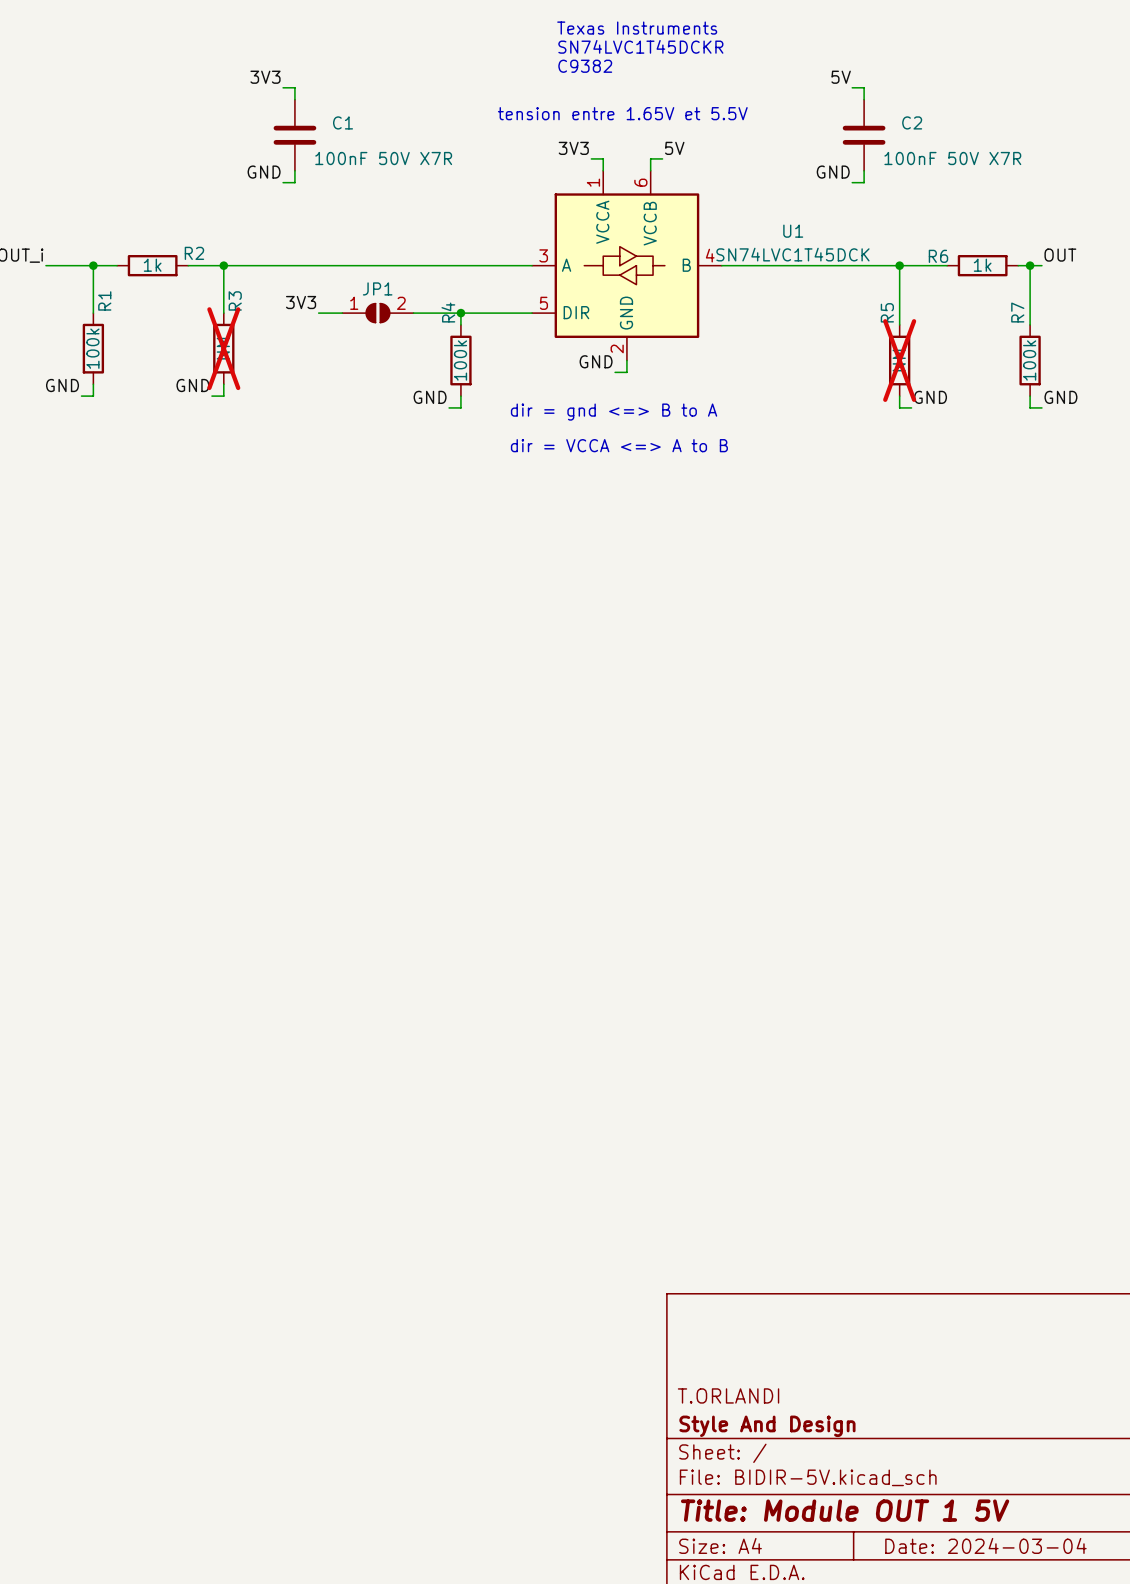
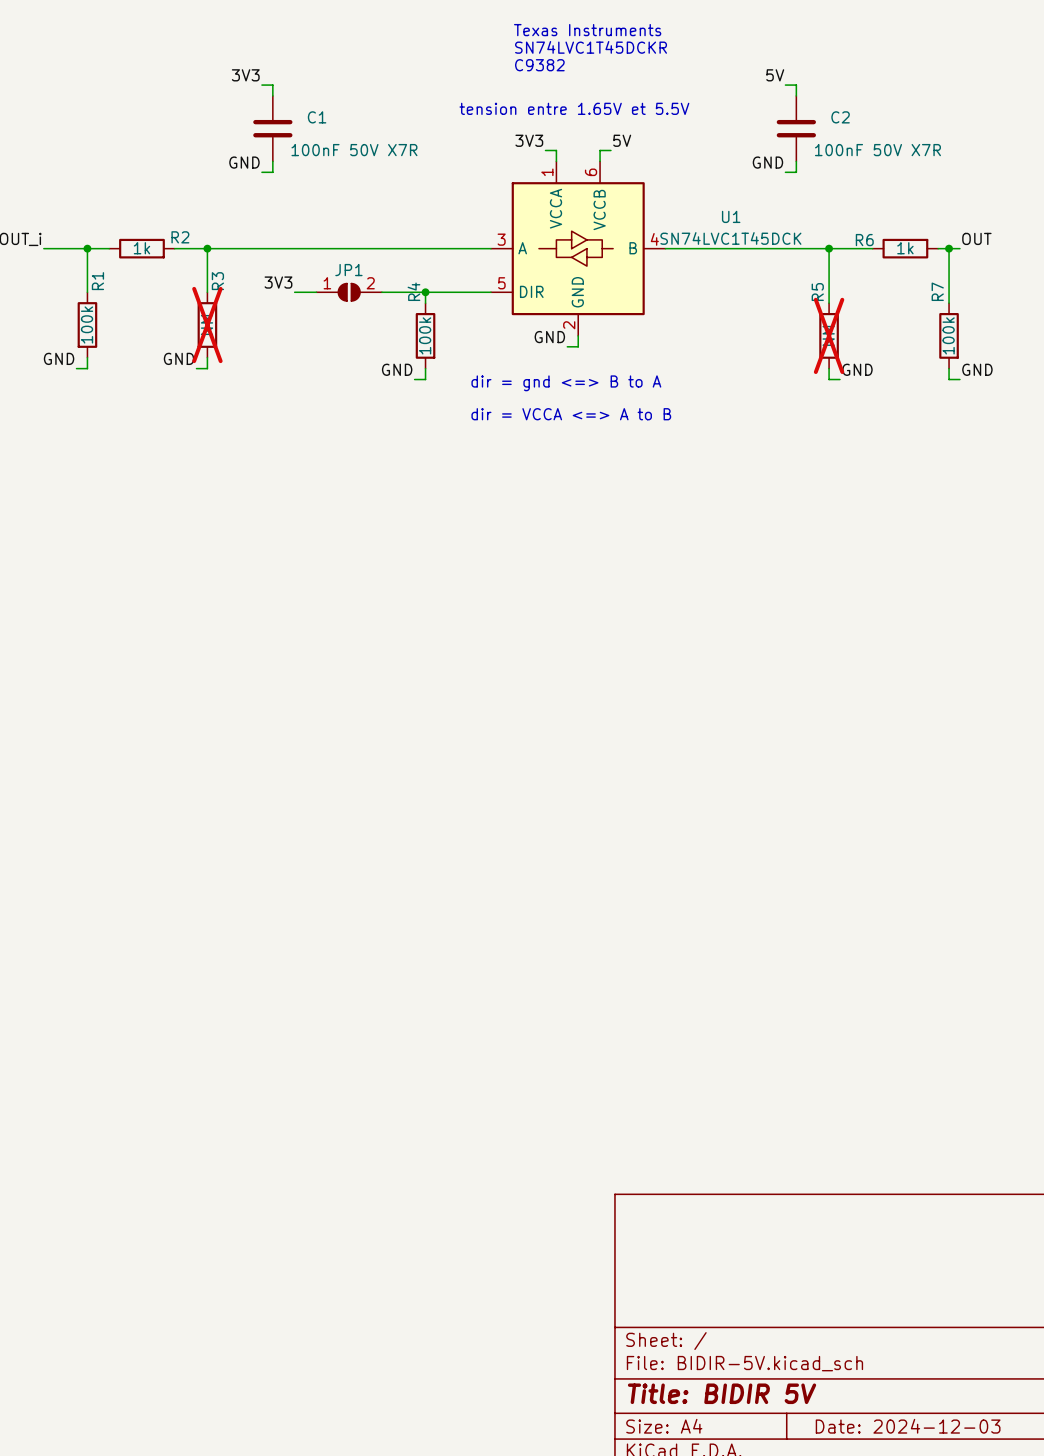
title block: T.ORLANDI (728, 1395) -> none
title block: Style And Design (767, 1426) -> none
title block: Title: Module OUT 1 5V (845, 1510) -> Title: BIDIR 5V (722, 1393)
title block: Date: 2024-03-04 (985, 1545) -> Date: 2024-12-03 (908, 1426)

